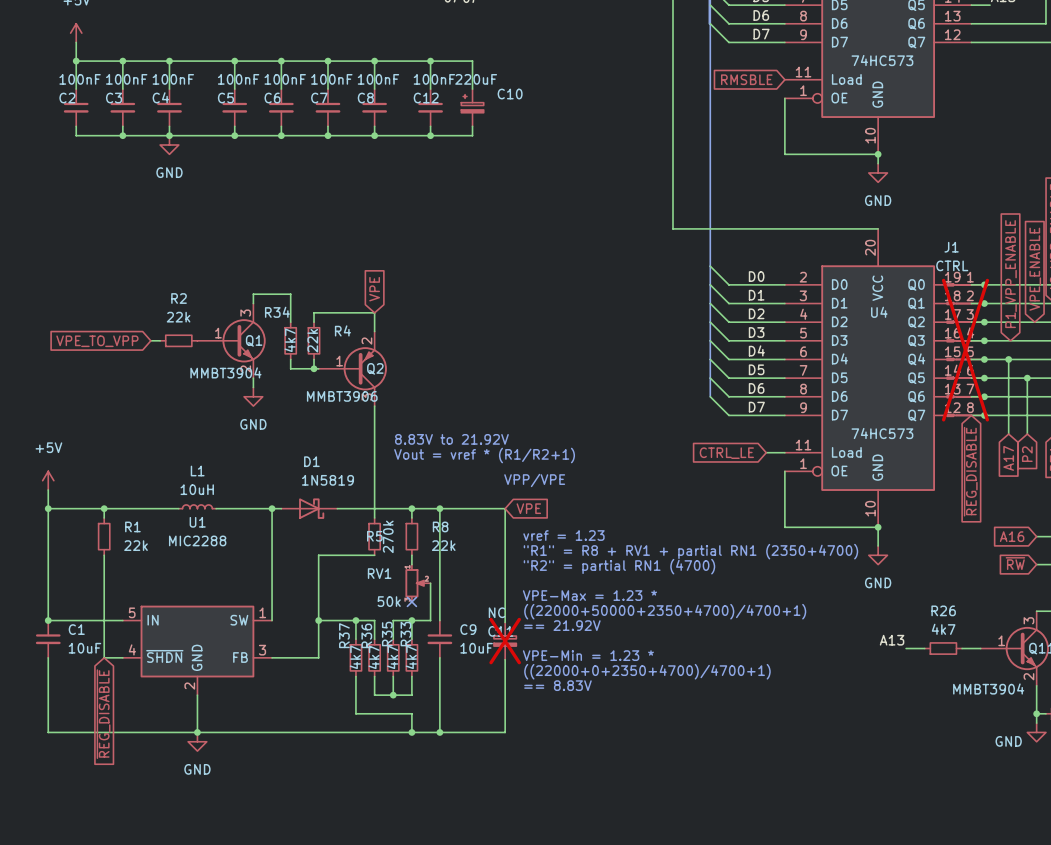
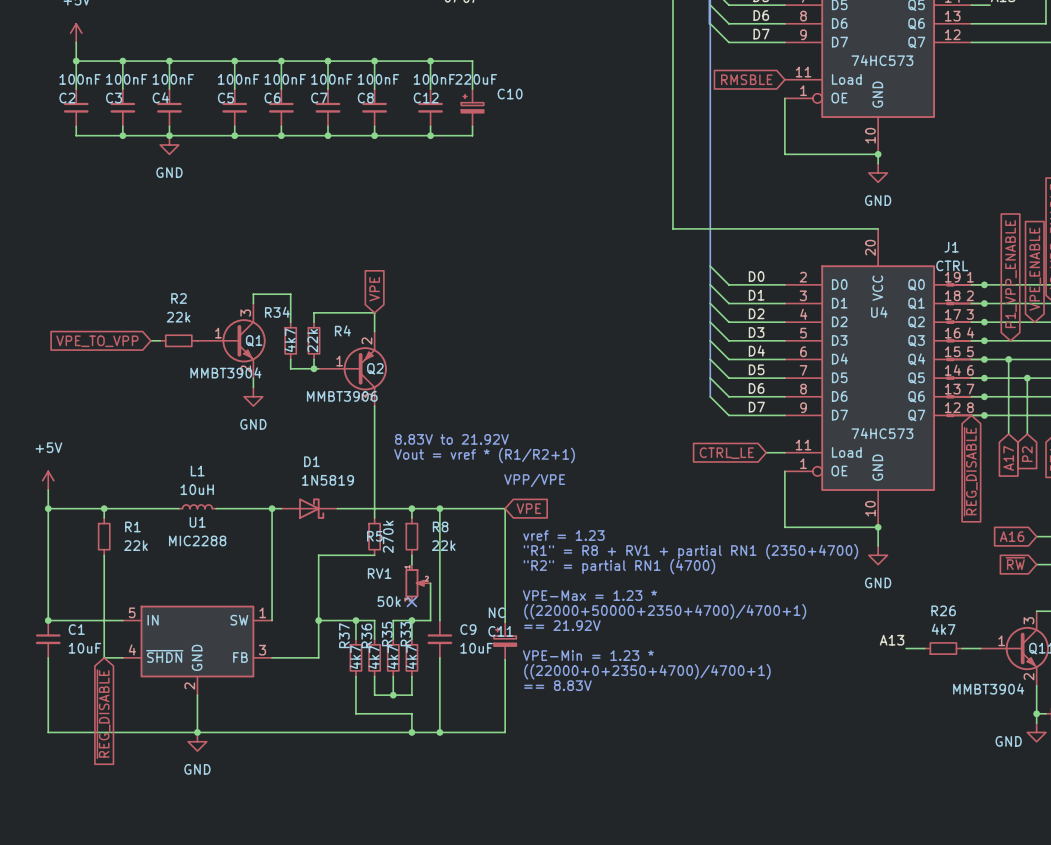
J1 do-not-place cross: (965, 350) -> none
C11 do-not-place cross: (505, 641) -> none

